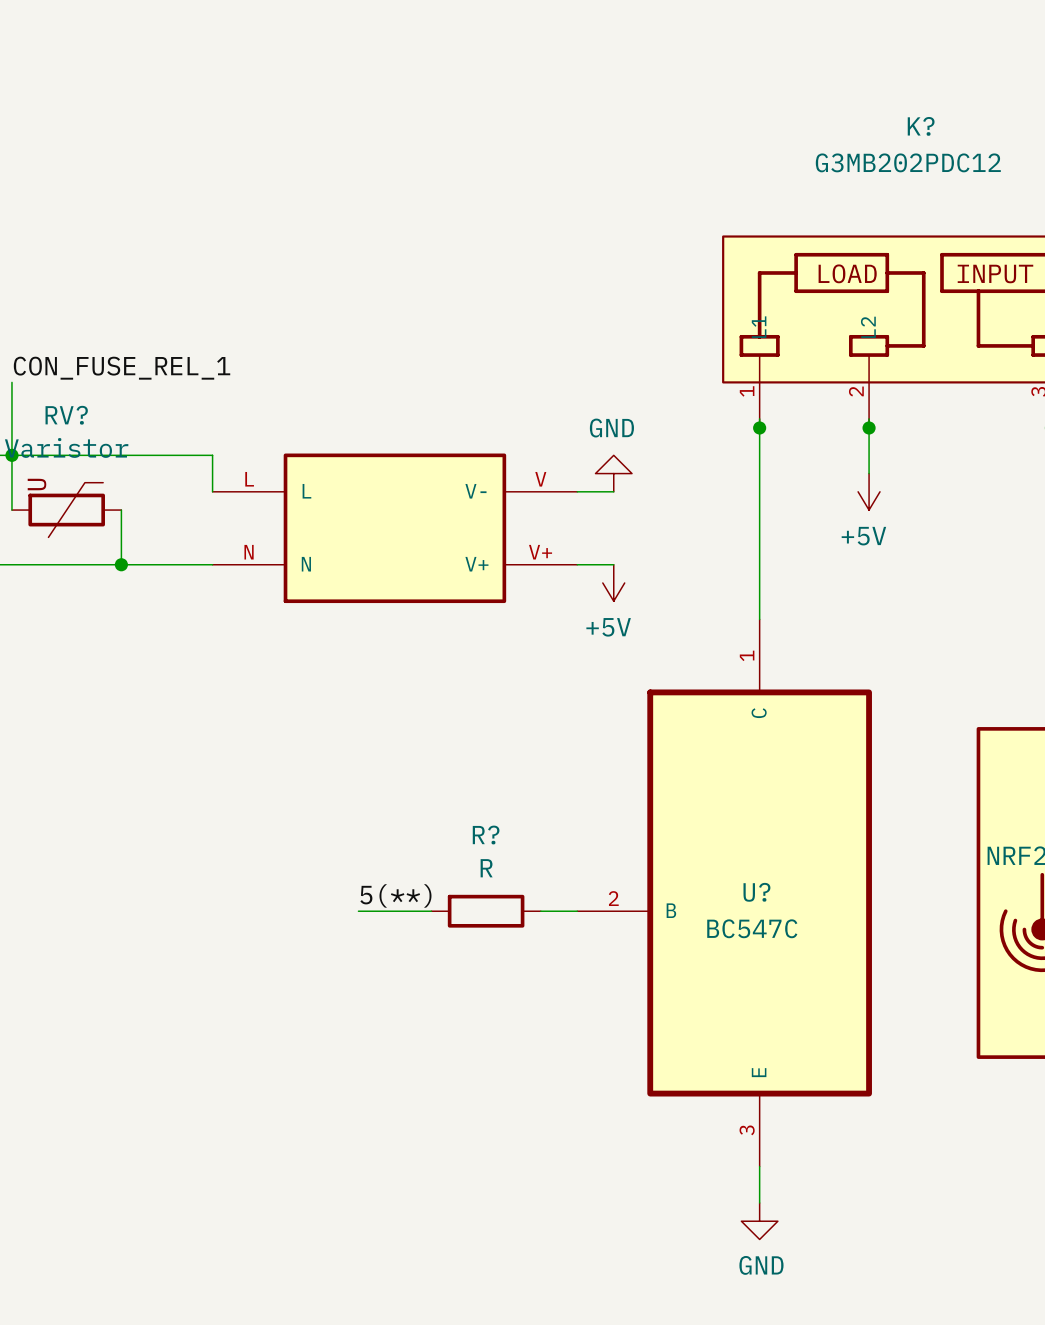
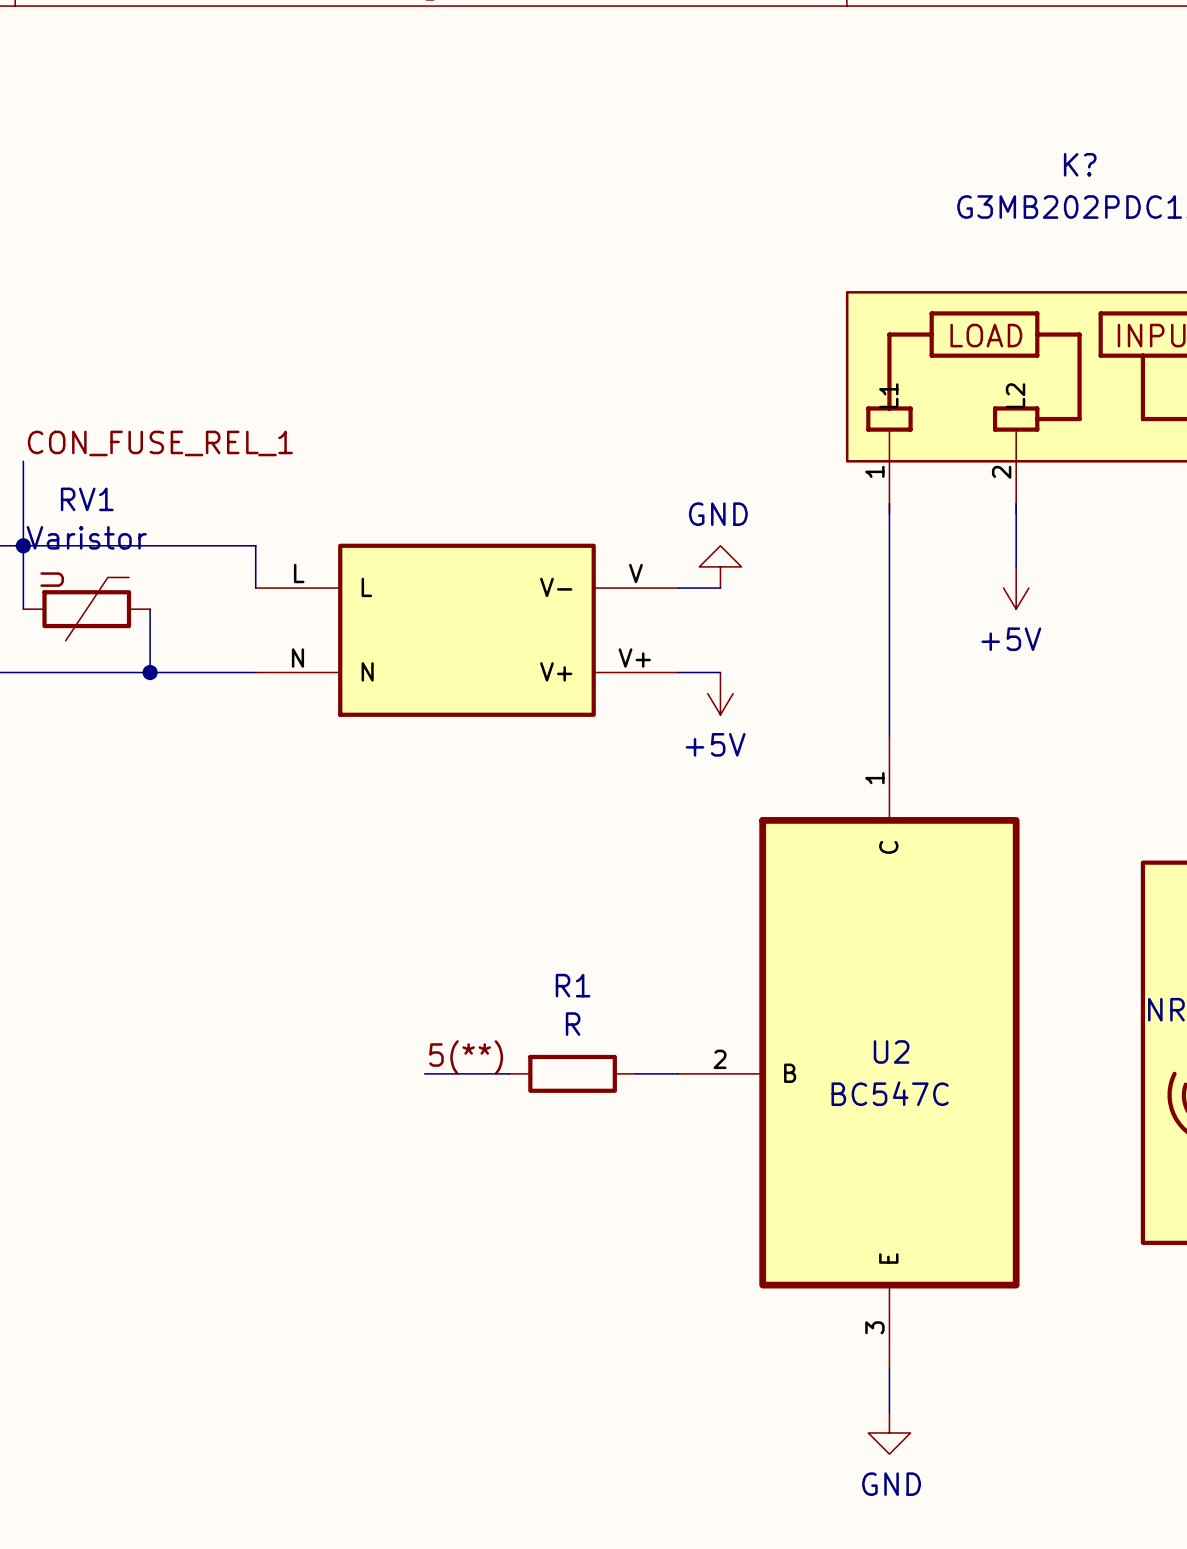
RV? name: RV? (66, 415) -> RV1 (87, 499)
junction: (759, 427) -> none
junction: (869, 427) -> none
R? name: R? (486, 835) -> R1 (573, 985)
U? name: U? (756, 892) -> U2 (891, 1051)

